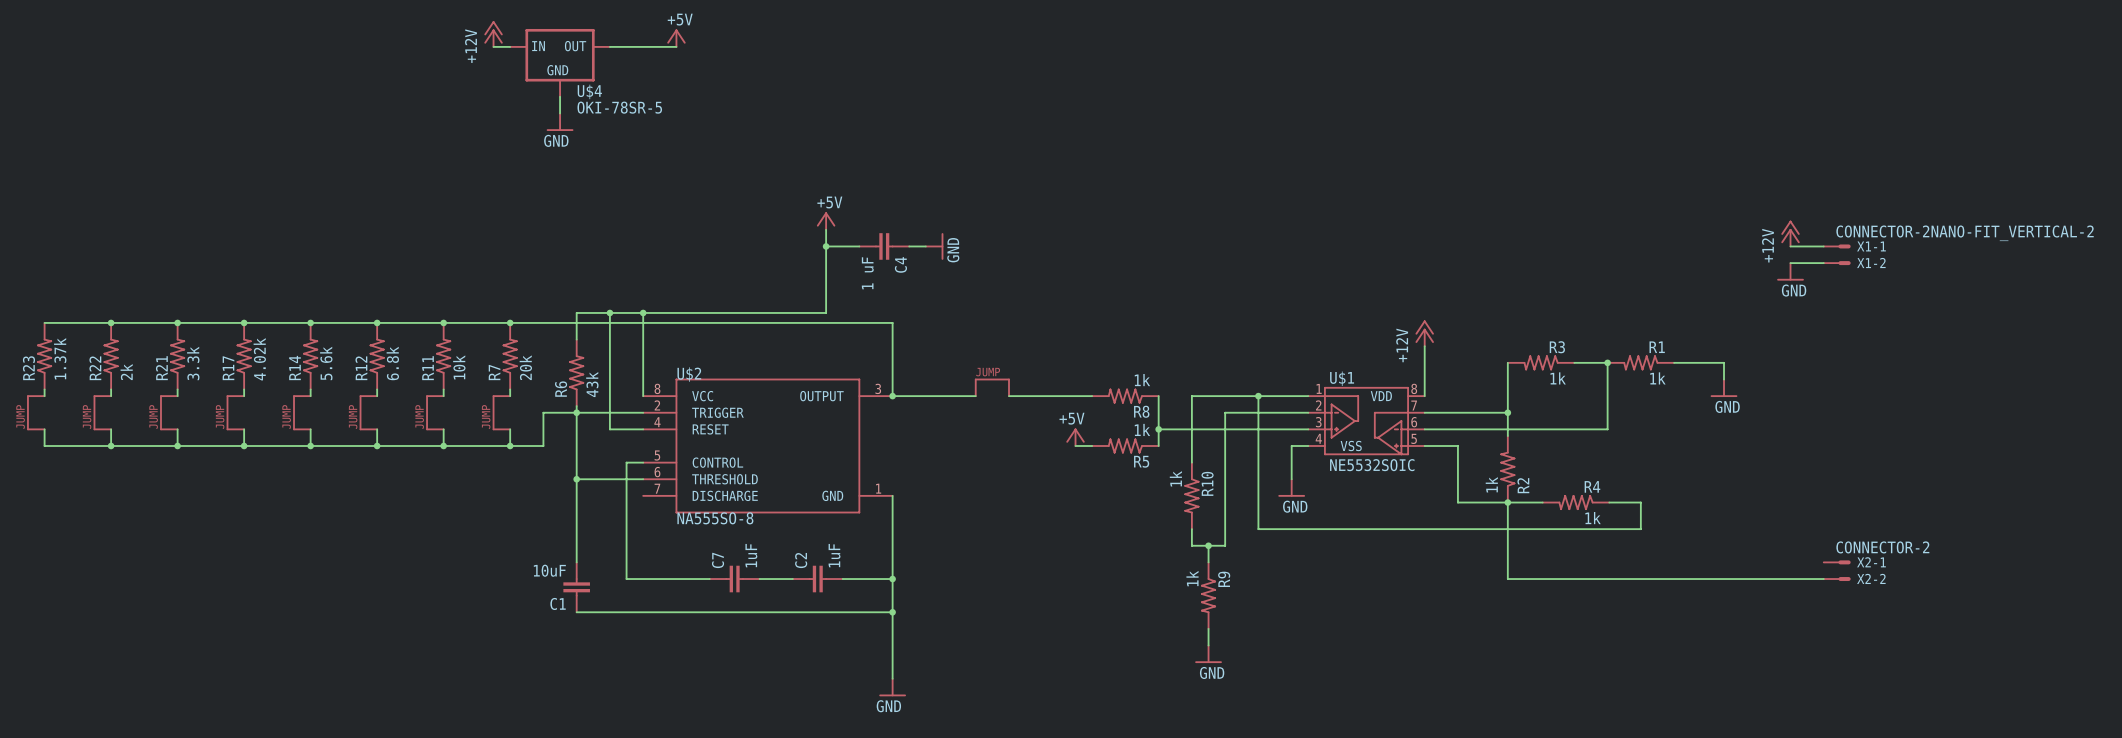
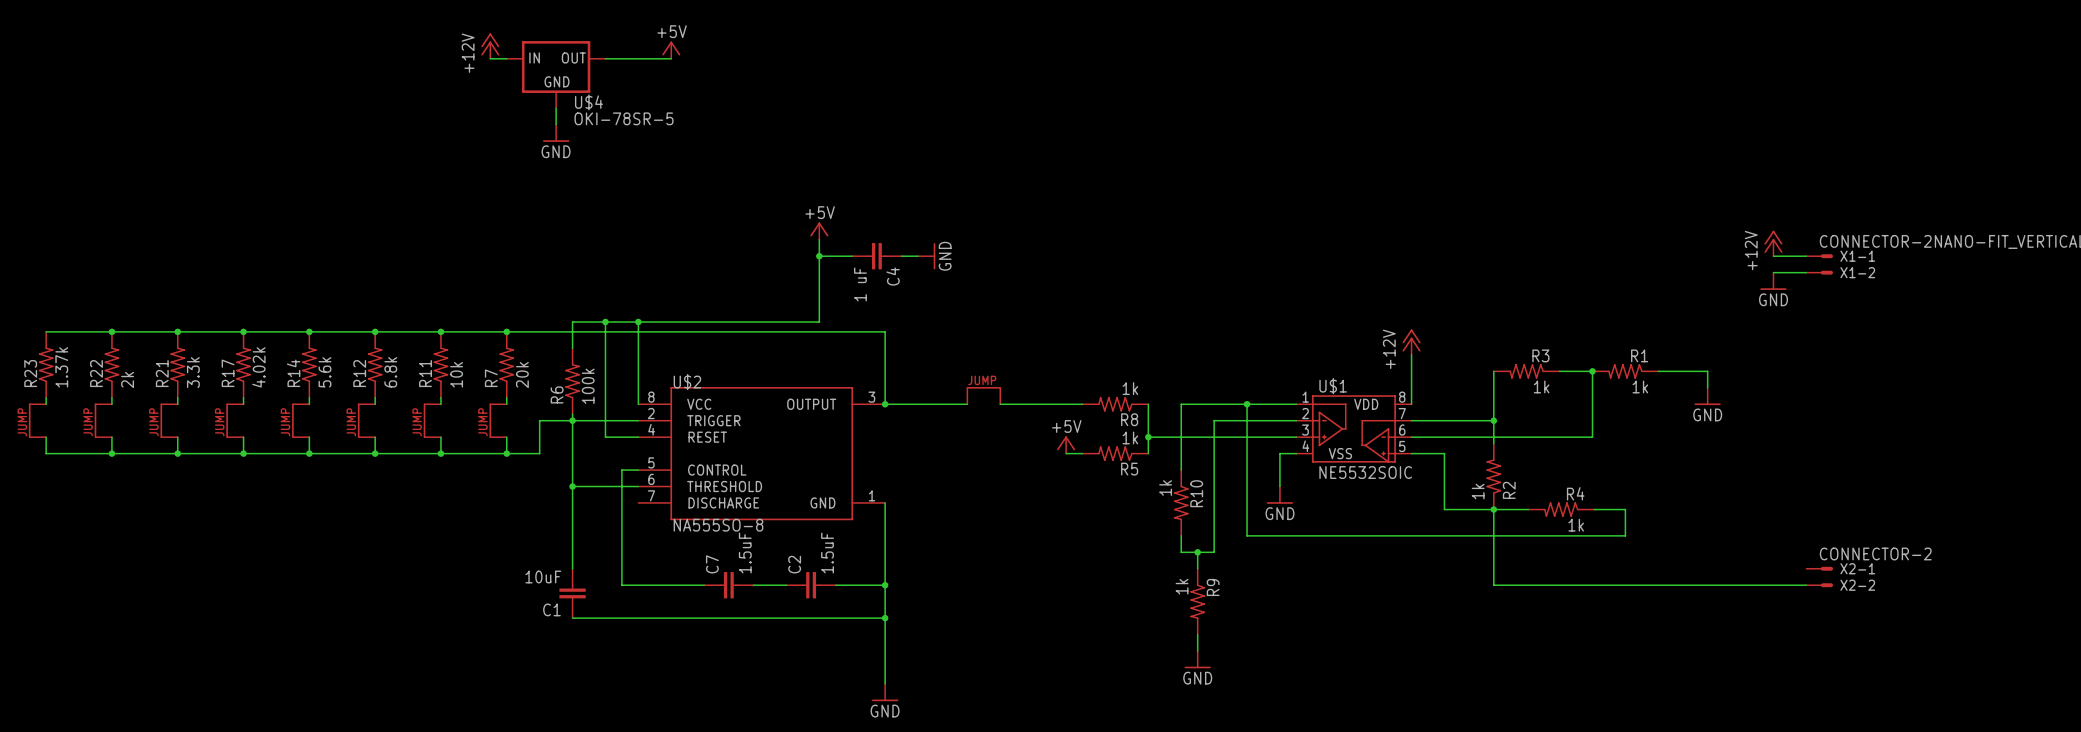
R6 value: 43k (592, 384) -> 100k (588, 386)
C7 value: 1uF (751, 555) -> 1.5uF (745, 553)
C2 value: 1uF (834, 555) -> 1.5uF (827, 553)

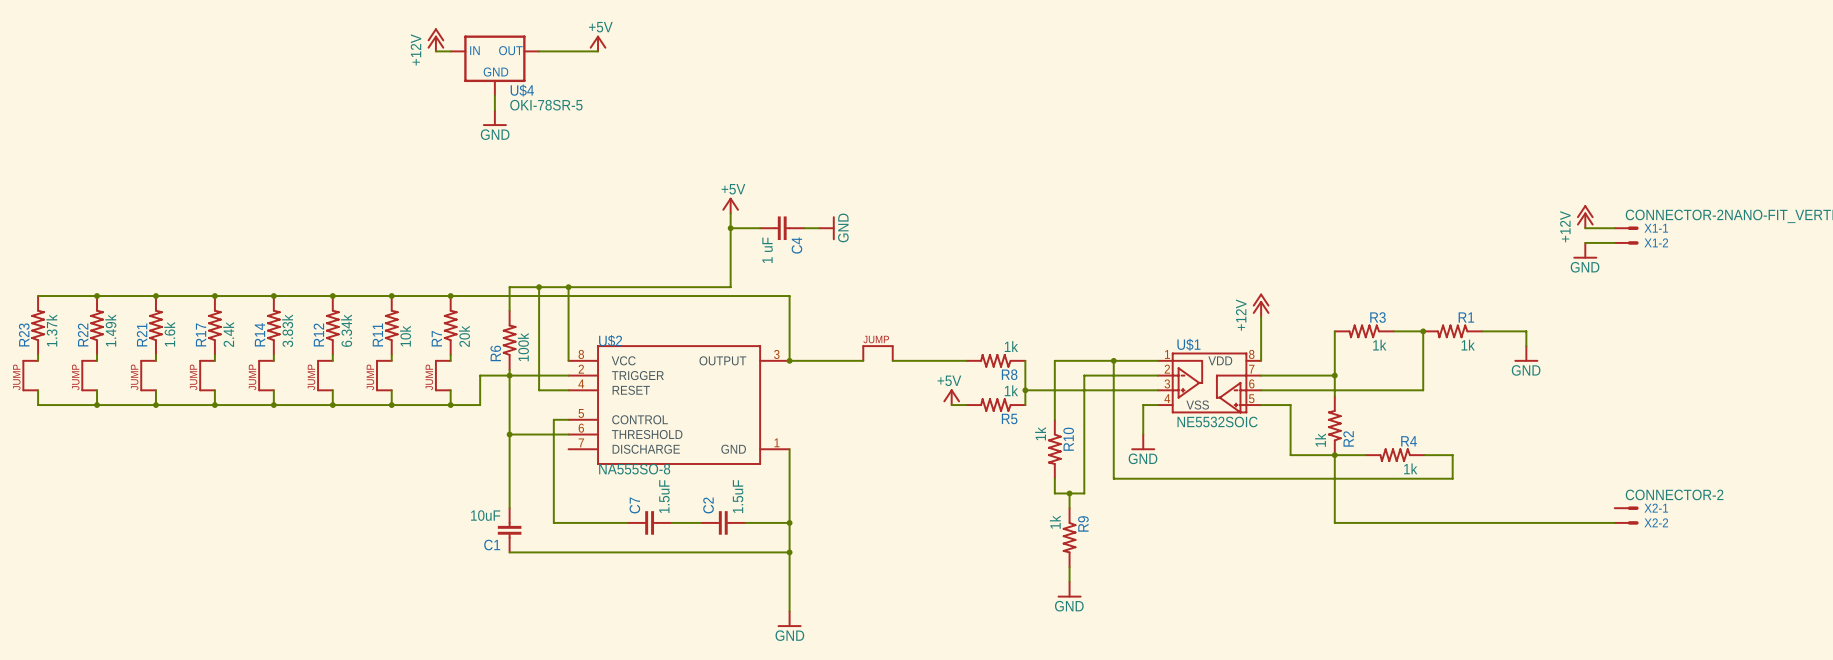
R17 value: 4.02k (258, 367) -> 2.4k (228, 334)
R21 value: 3.3k (193, 372) -> 1.6k (169, 334)
R14 value: 5.6k (324, 372) -> 3.83k (287, 330)
R12 value: 6.8k (390, 372) -> 6.34k (346, 330)
R22 value: 2k (127, 379) -> 1.49k (110, 330)

